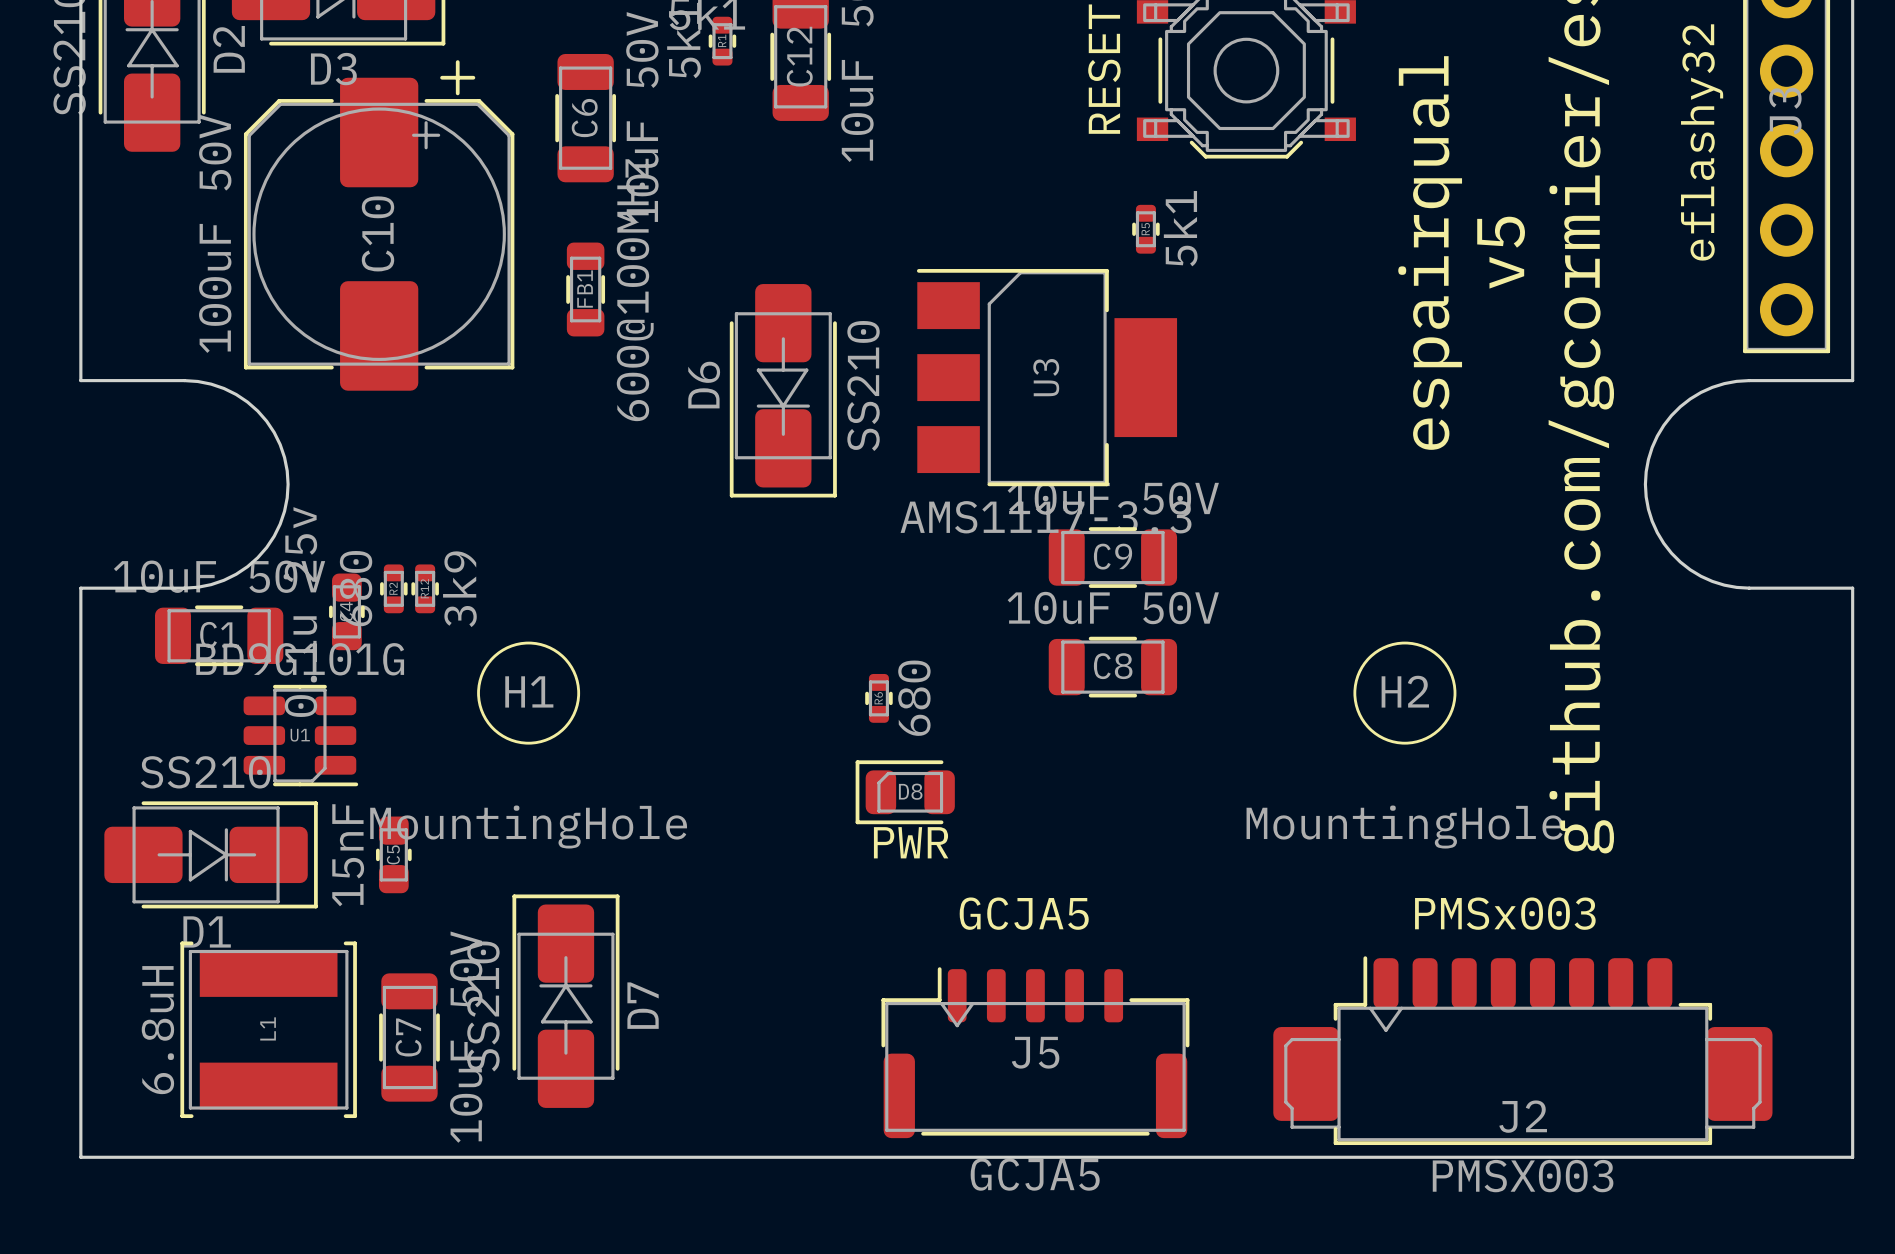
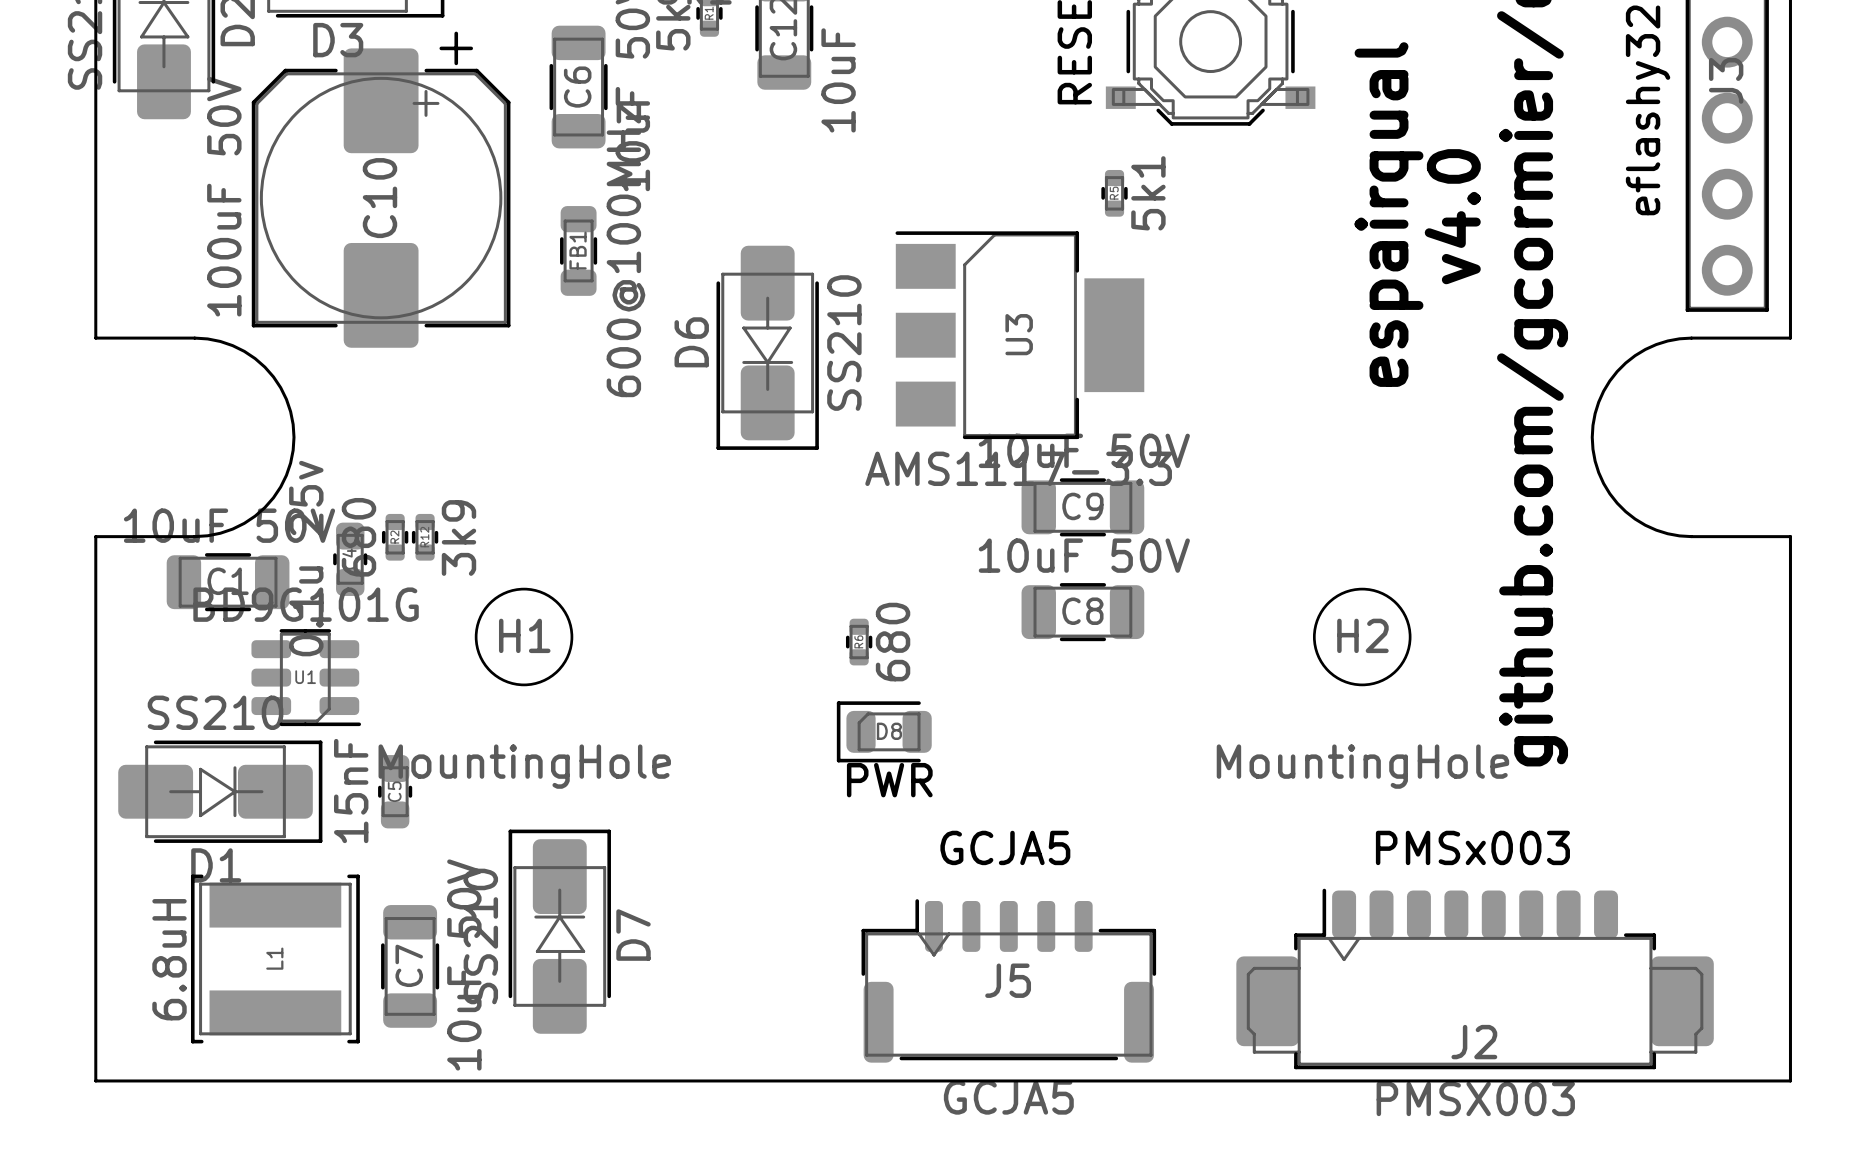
text: v5 (1501, 252) -> v4.0 (1452, 216)

